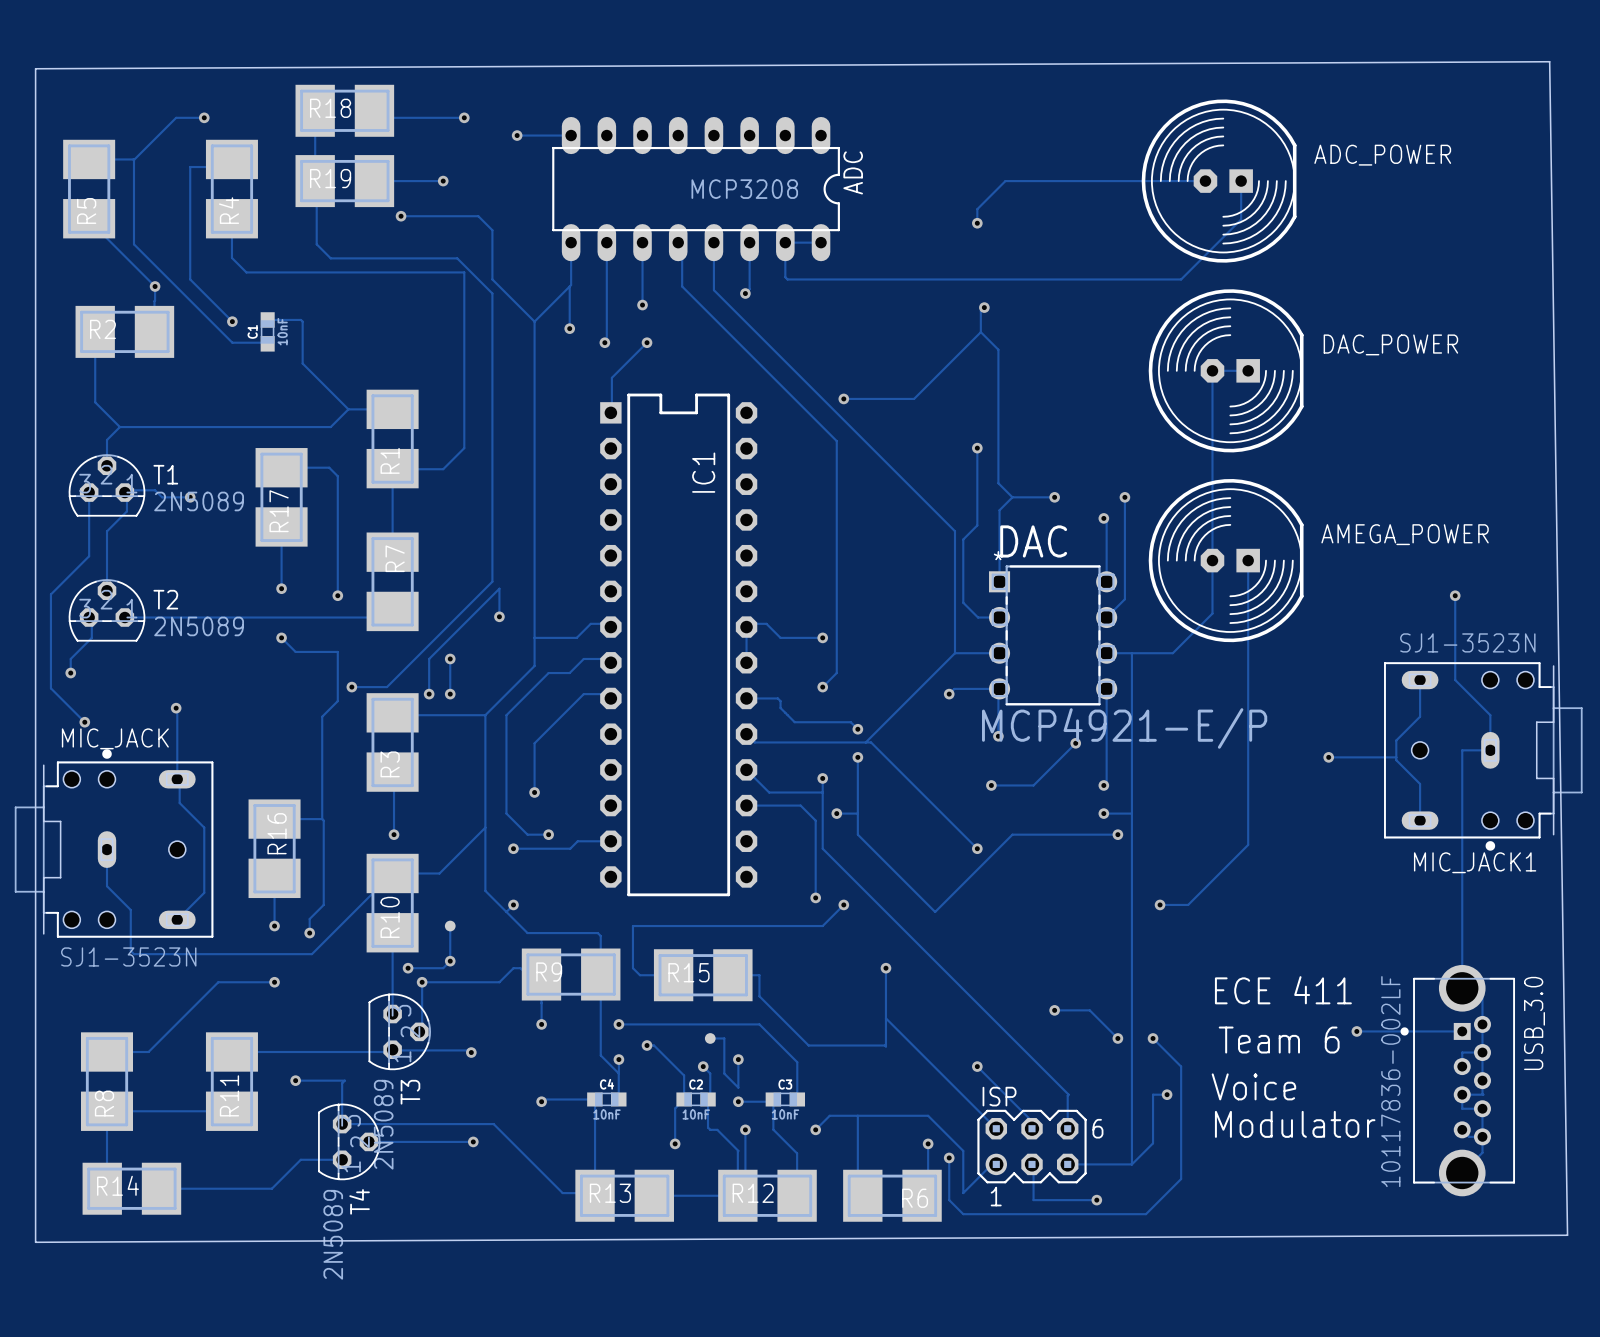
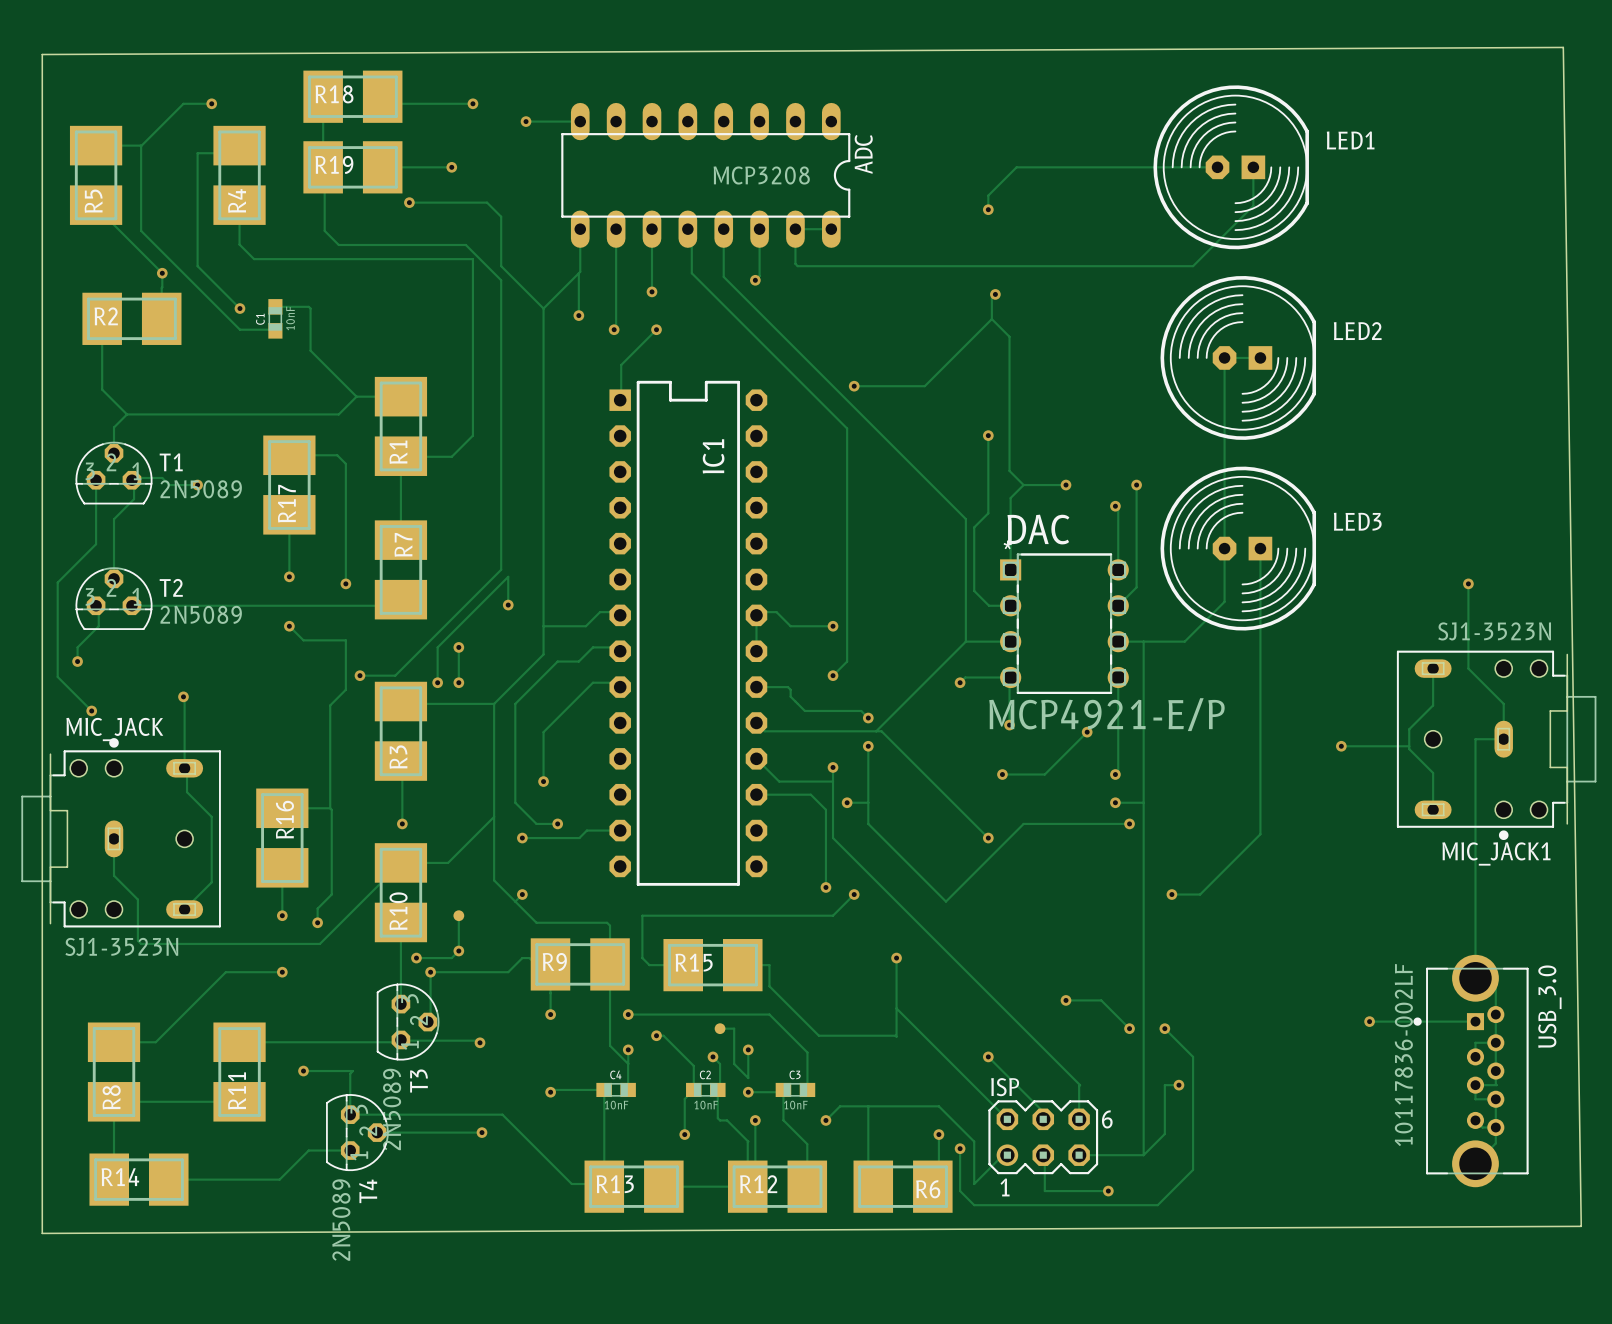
ADC_POWER name: ADC_POWER (1382, 155) -> LED1 (1350, 140)
DAC_POWER name: DAC_POWER (1390, 344) -> LED2 (1357, 331)
AMEGA_POWER name: AMEGA_POWER (1405, 534) -> LED3 (1357, 521)
text: ECE 411 (1283, 990) -> none
text: Team 6 (1279, 1040) -> none
text: Voice (1253, 1086) -> none
text: Modulator (1295, 1124) -> none

